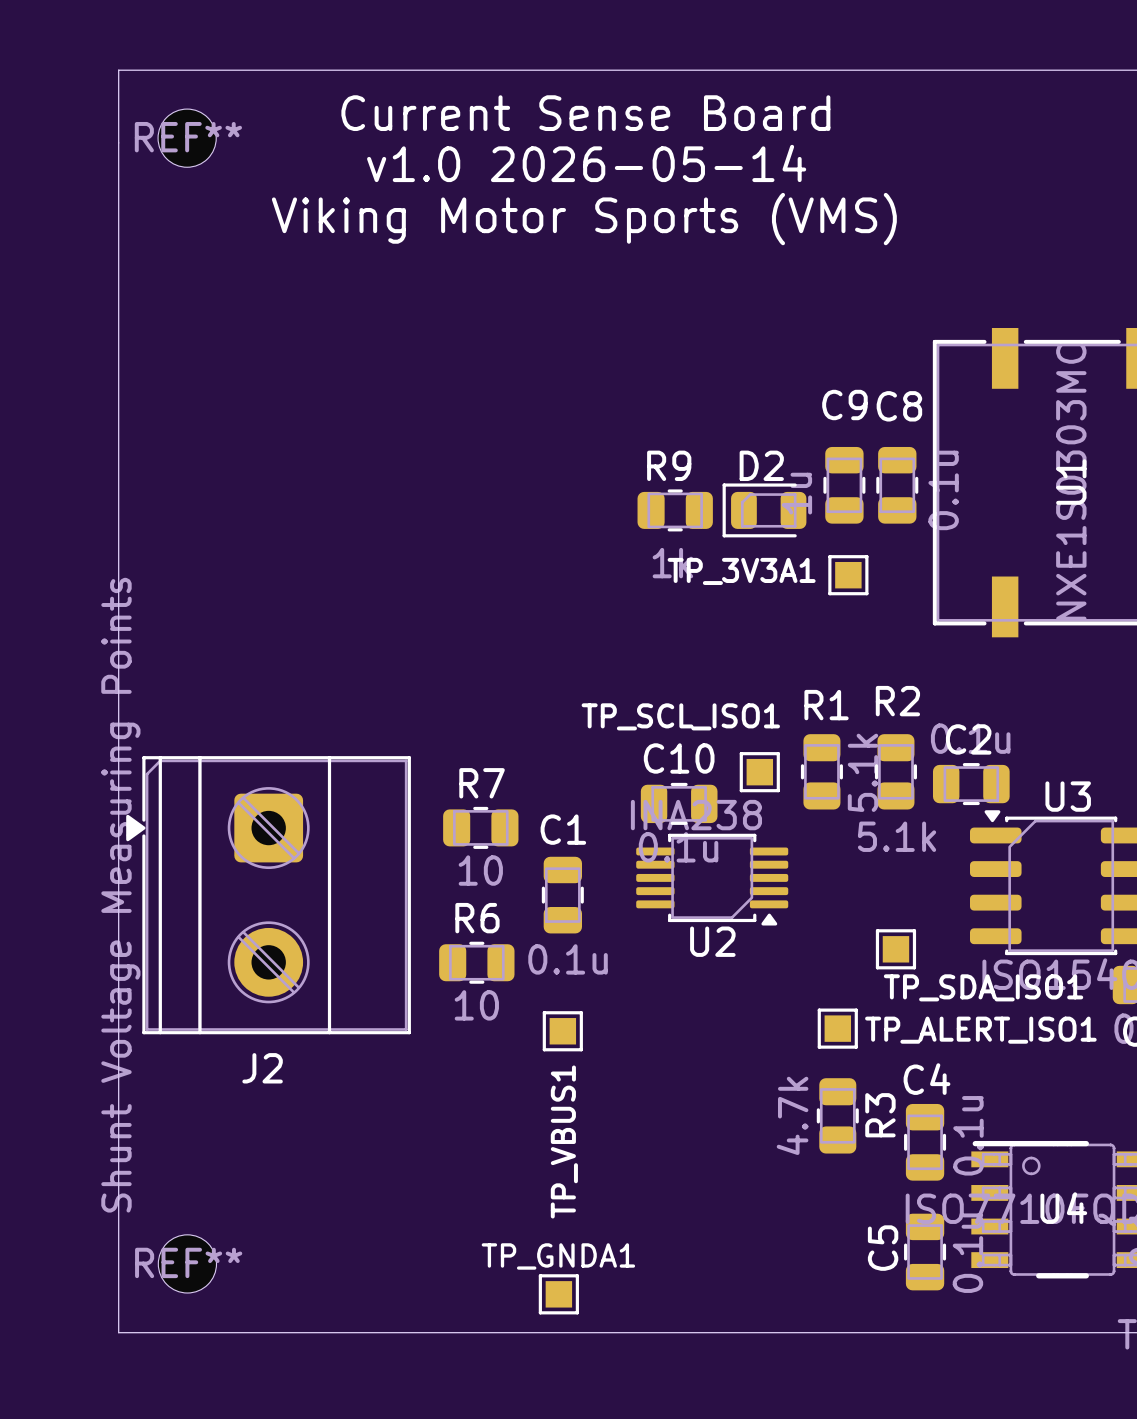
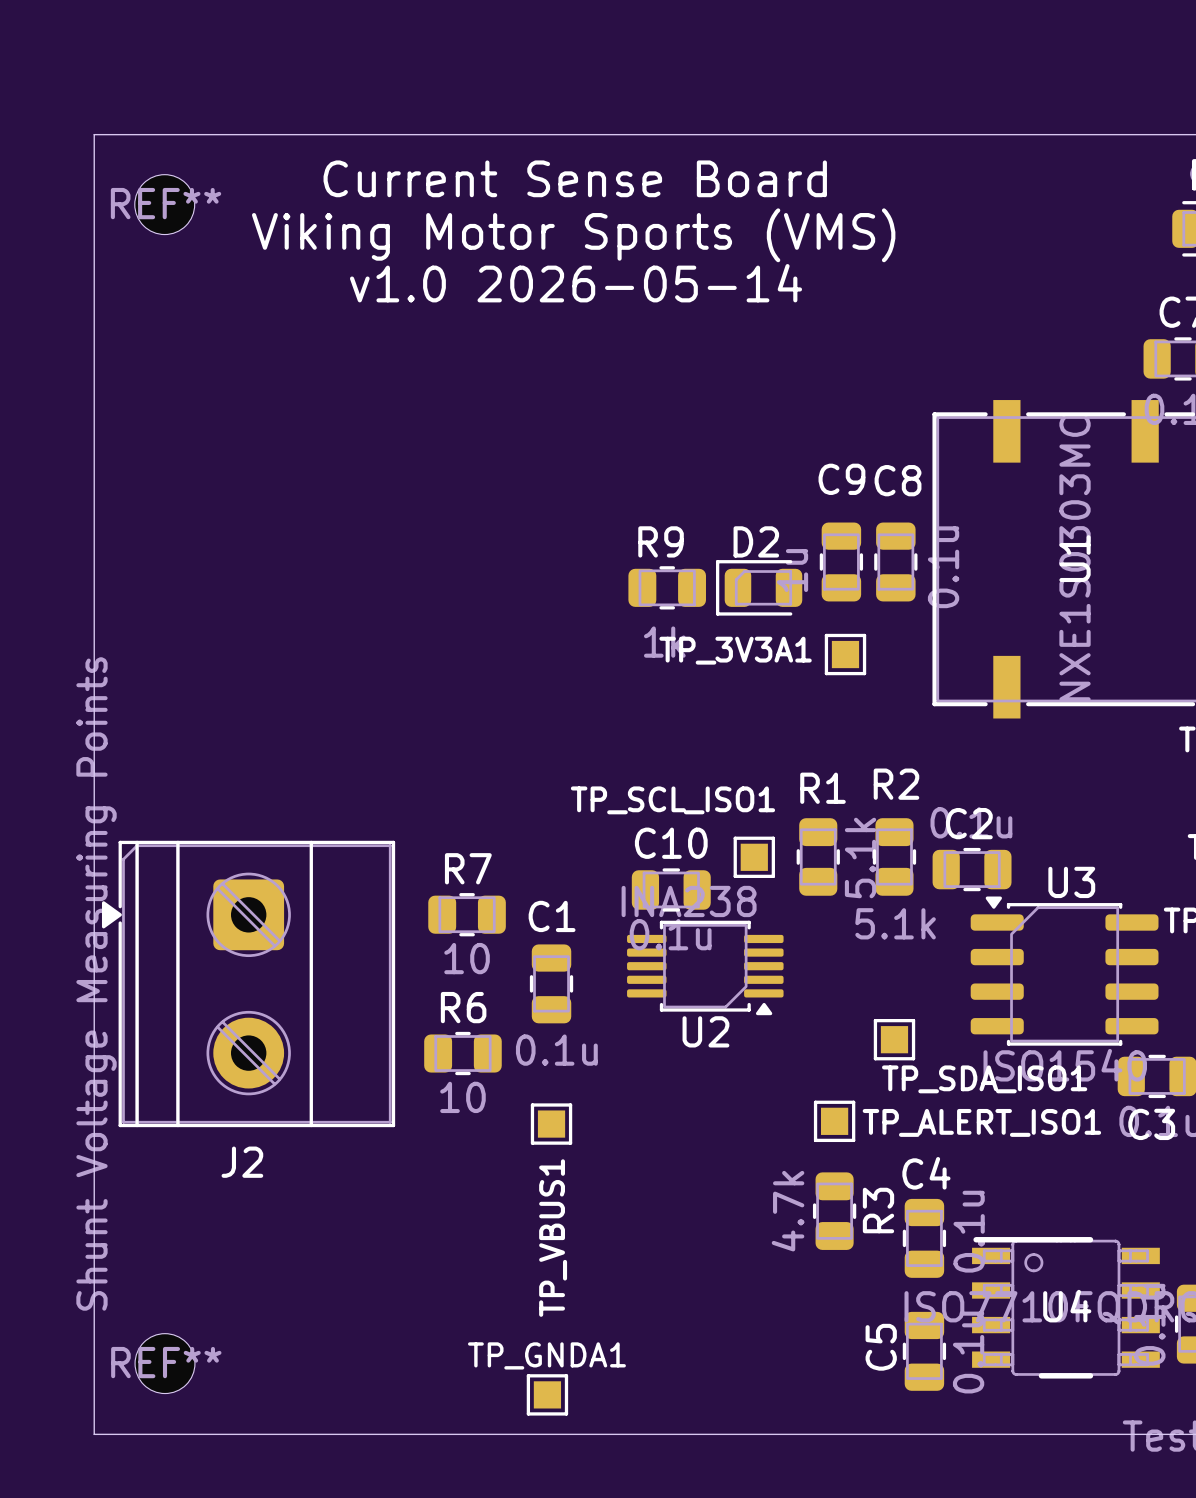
text: v1.0 2026-05-14 (586, 163) -> Viking Motor Sports (VMS) (573, 235)
text: Viking Motor Sports (VMS) (584, 219) -> v1.0 2026-05-14 (576, 283)

